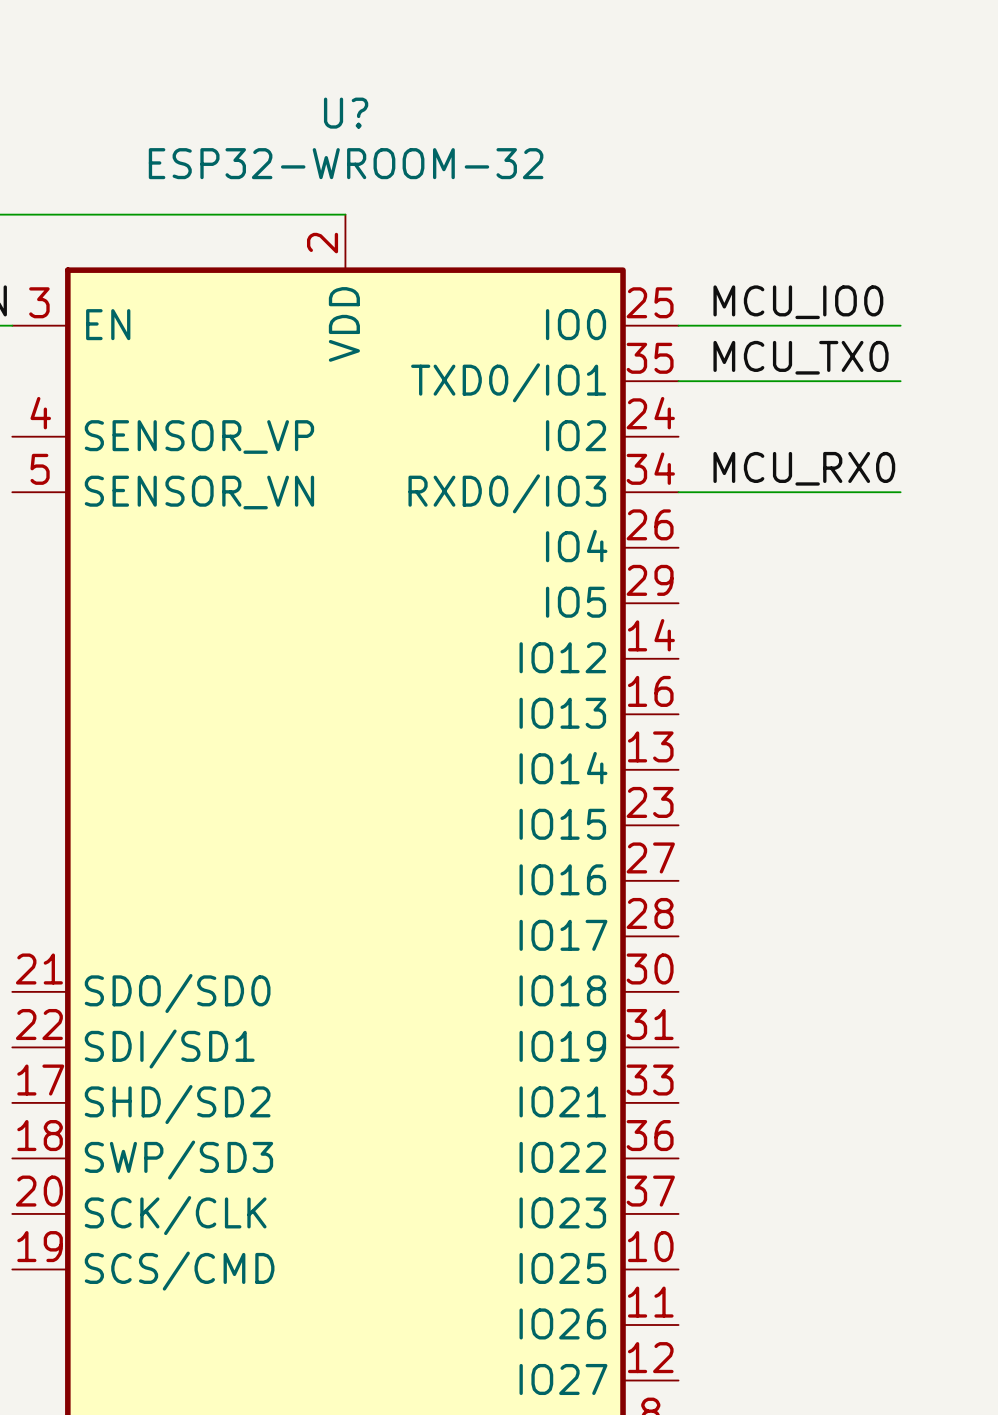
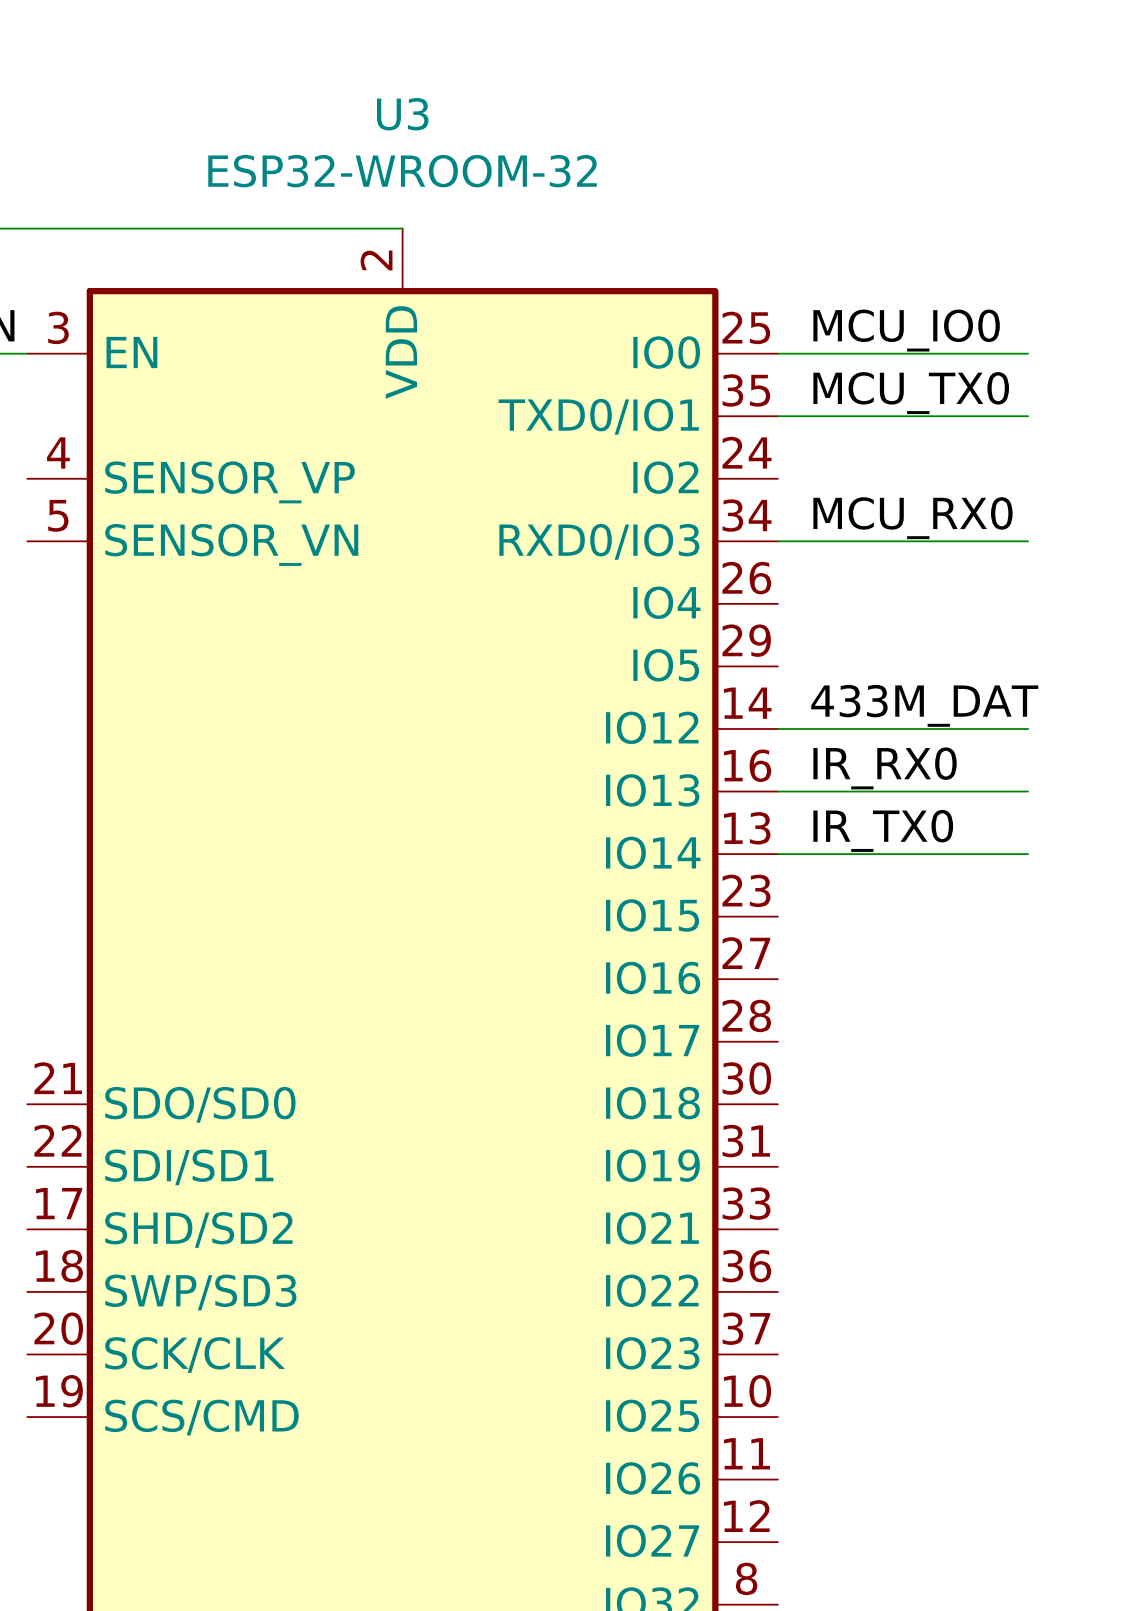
U? name: U? (346, 113) -> U3 (402, 114)
label: none -> 433M_DAT (924, 705)
wire: none -> (777, 728) (1028, 728)
label: none -> IR_RX0 (885, 768)
wire: none -> (777, 791) (1028, 791)
label: none -> IR_TX0 (883, 830)
wire: none -> (777, 854) (1028, 854)

